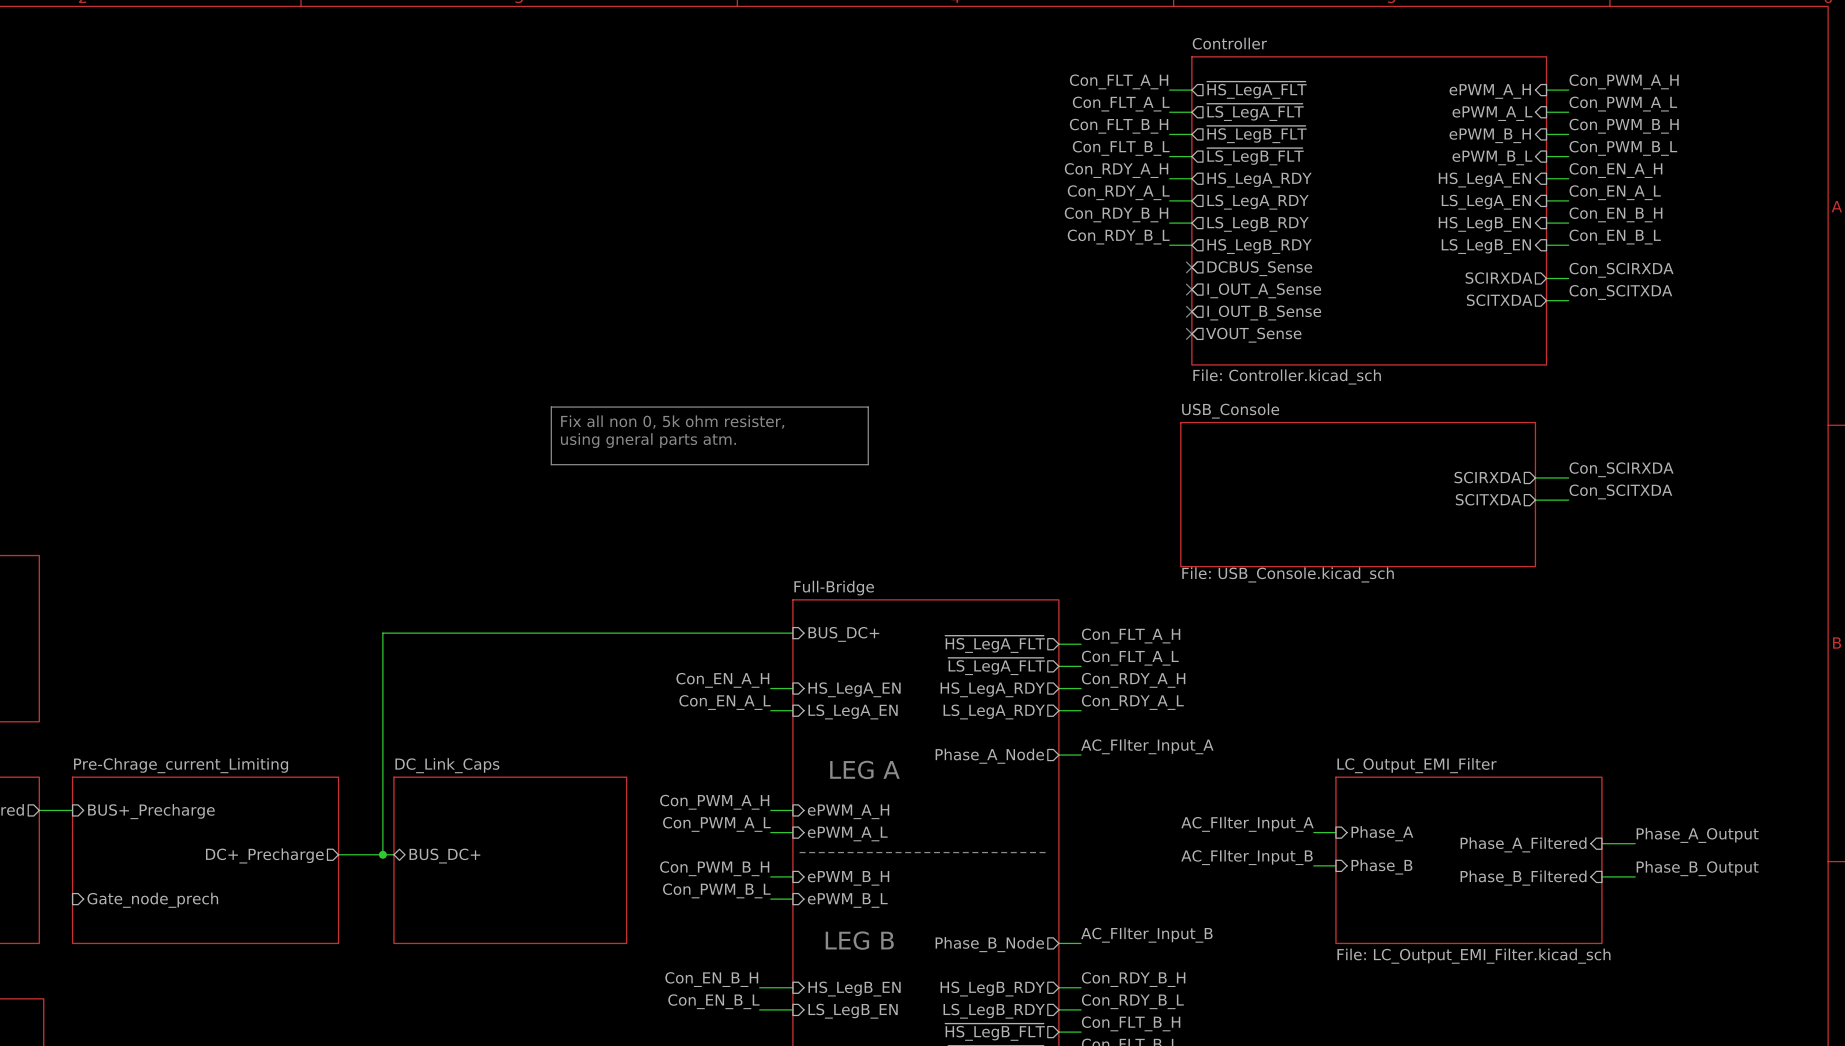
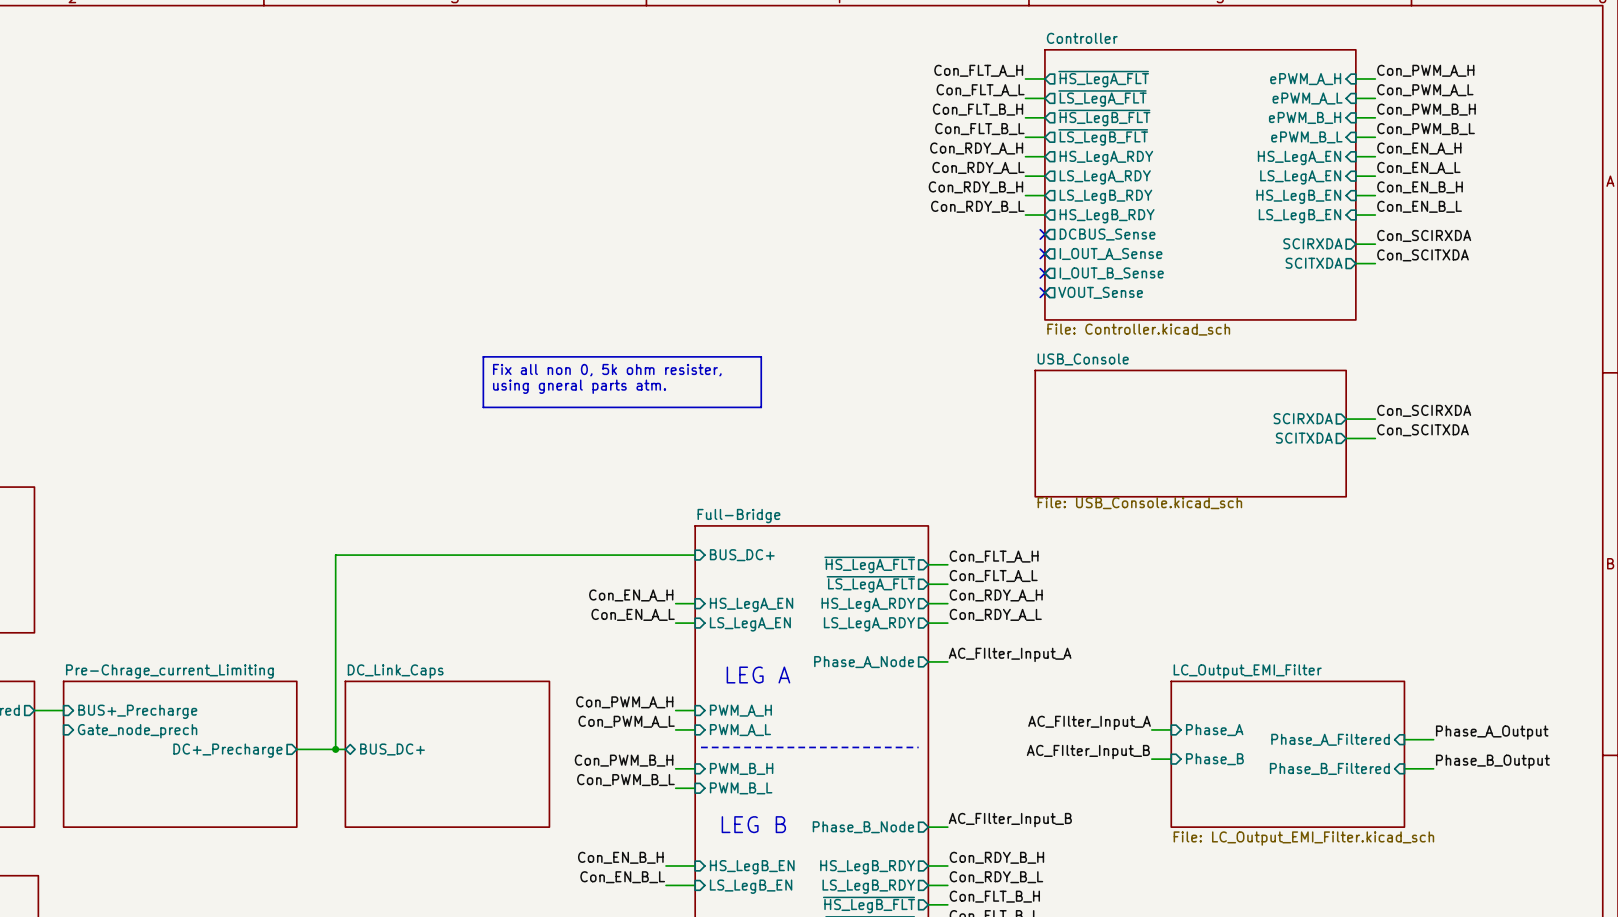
sheet pin: ePWM_A_H (848, 811) -> PWM_A_H (740, 710)
sheet pin: ePWM_A_L (847, 833) -> PWM_A_L (740, 730)
sheet pin: ePWM_B_H (848, 878) -> PWM_B_H (741, 768)
sheet pin position: Gate_node_prech (152, 900) -> Gate_node_prech (137, 731)
sheet pin: ePWM_B_L (847, 900) -> PWM_B_L (741, 788)

